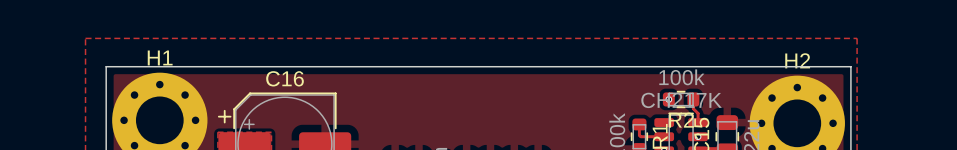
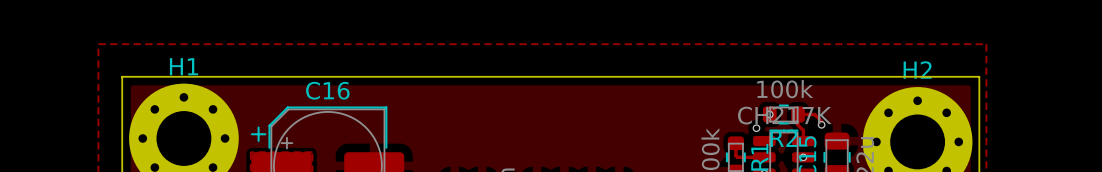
track: none -> (798, 114) (814, 114) (821, 121) (821, 124)
via: none -> (821, 124)
via: none -> (756, 128)

